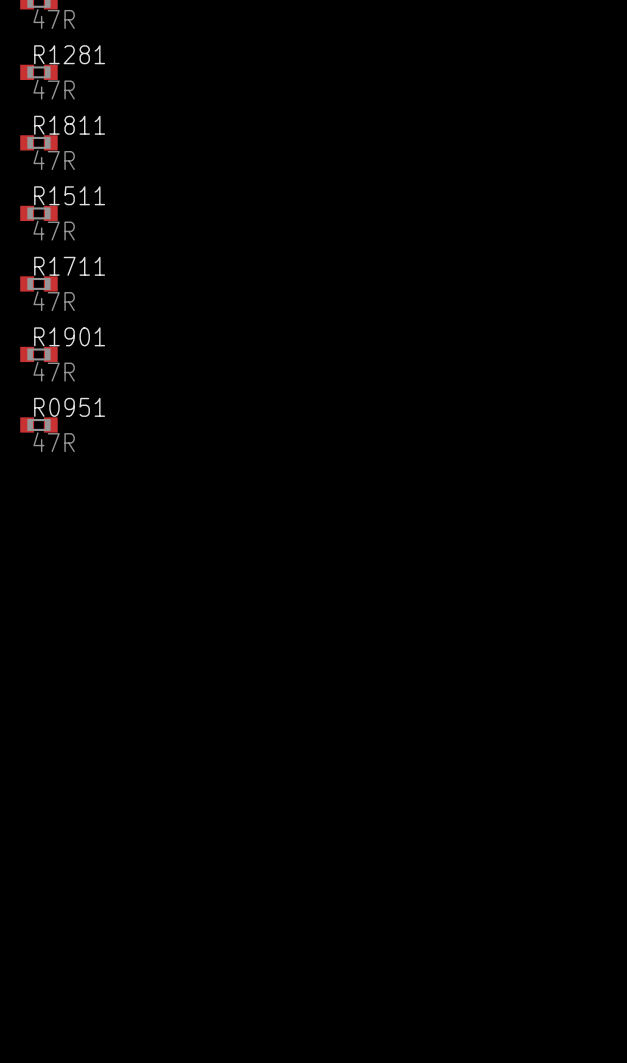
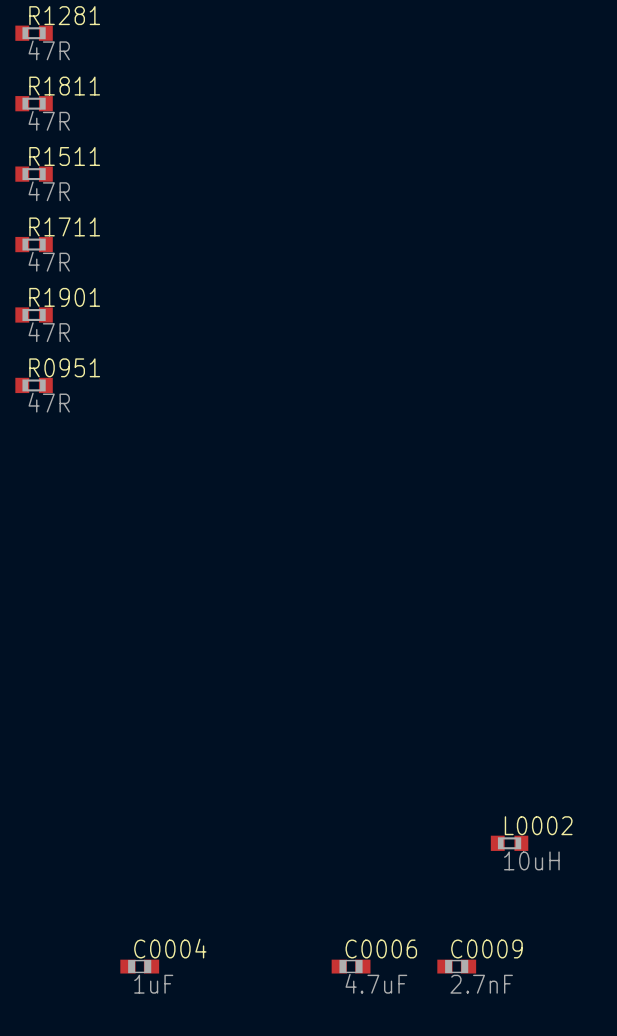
L0002: none -> 10uH (509, 843)
C0004: none -> 1uF (139, 966)
C0006: none -> 4.7uF (351, 966)
C0009: none -> 2.7nF (456, 966)

